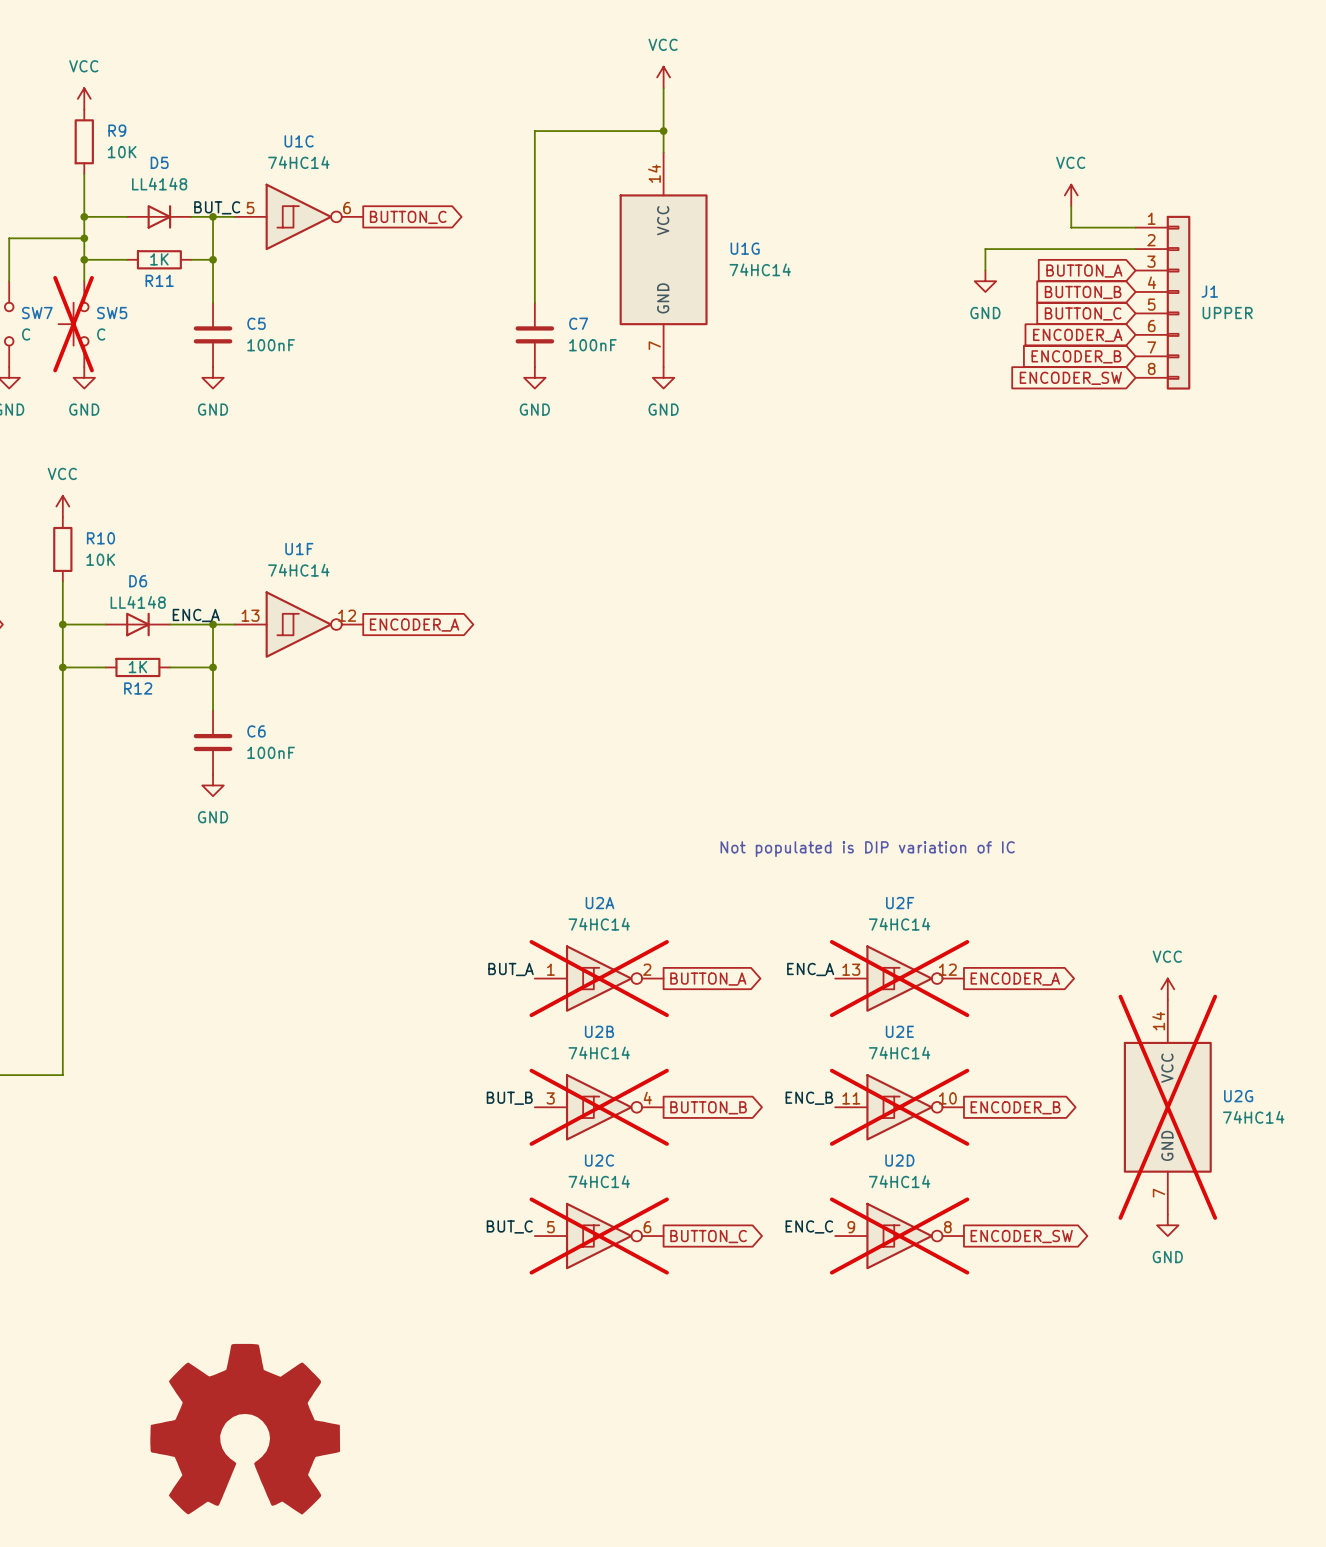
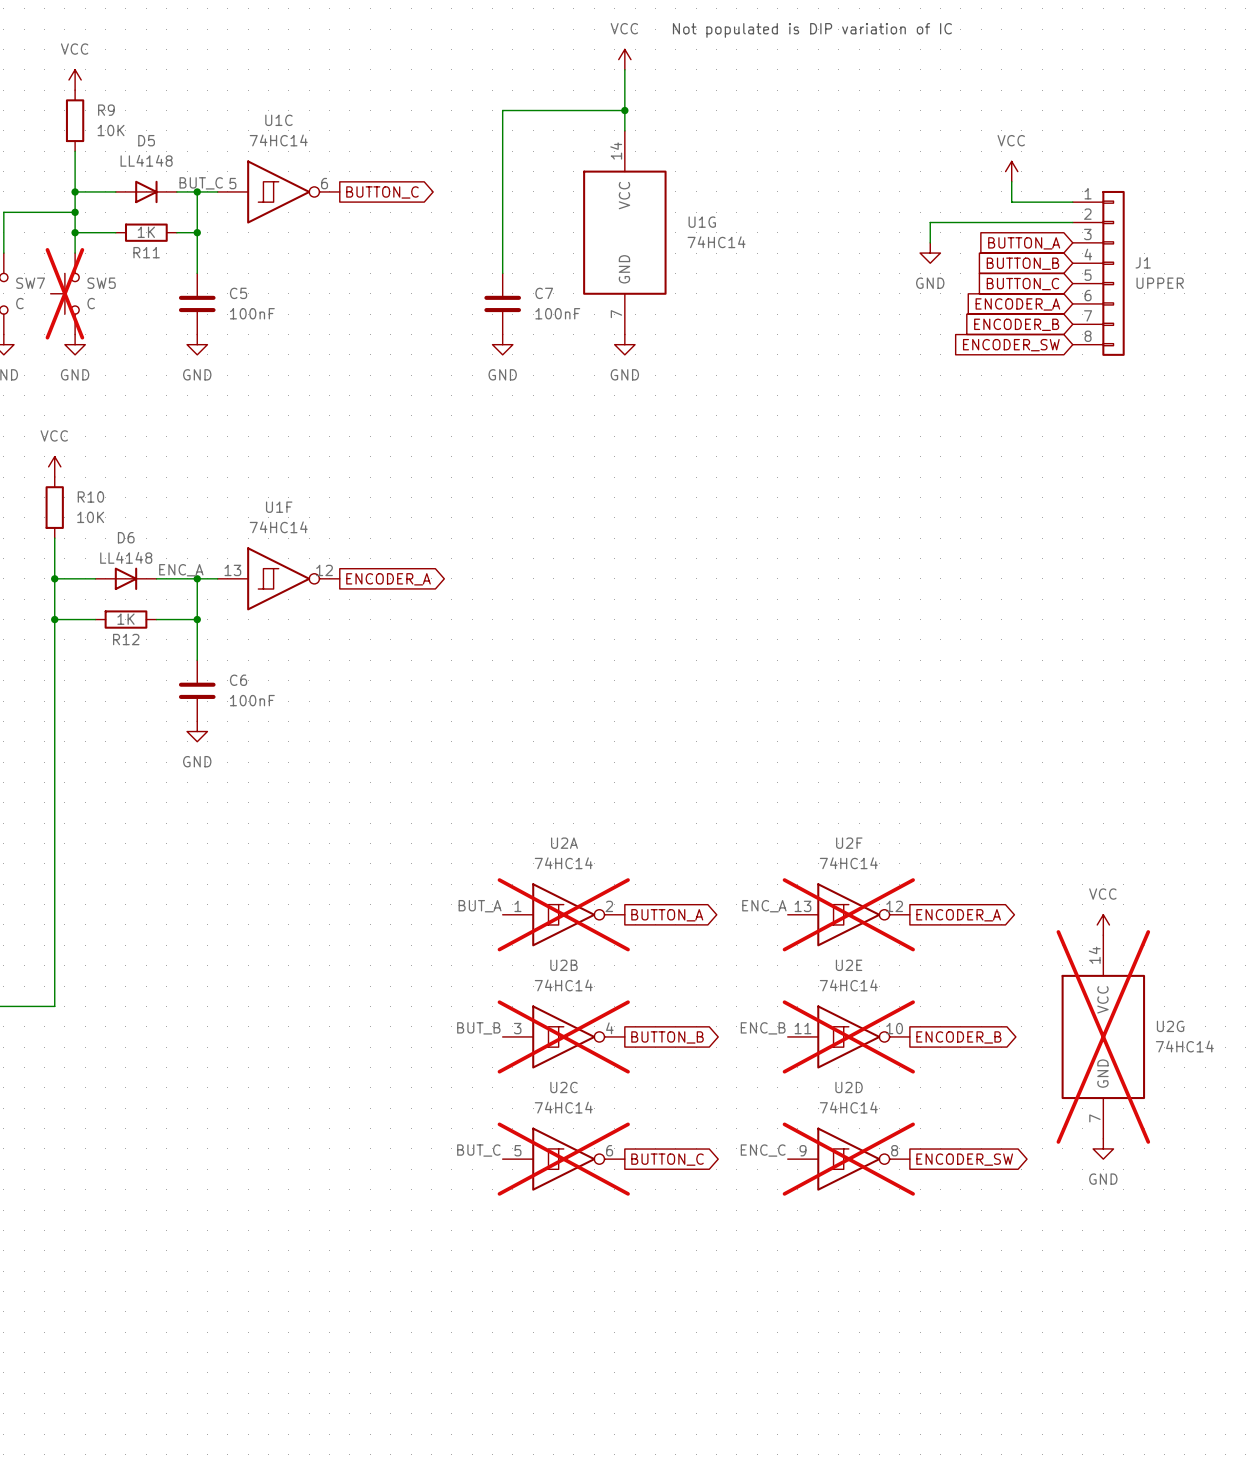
text: none -> Not populated is DIP variation of IC (812, 30)
text: Not populated is DIP variation of IC (867, 849) -> none
power symbol: (245, 1429) -> none

